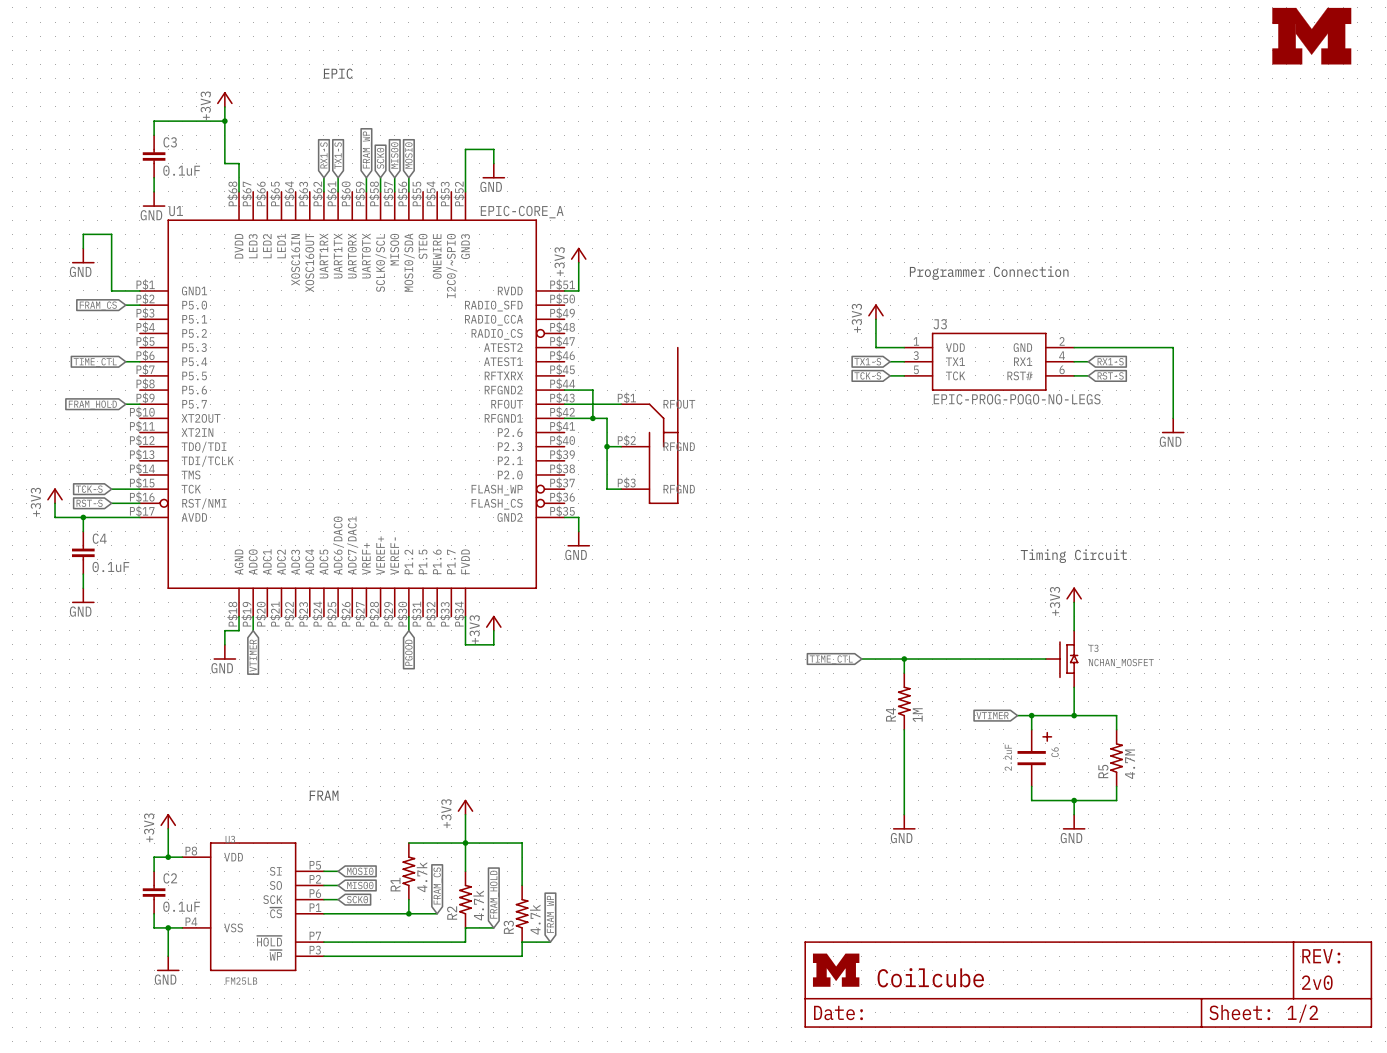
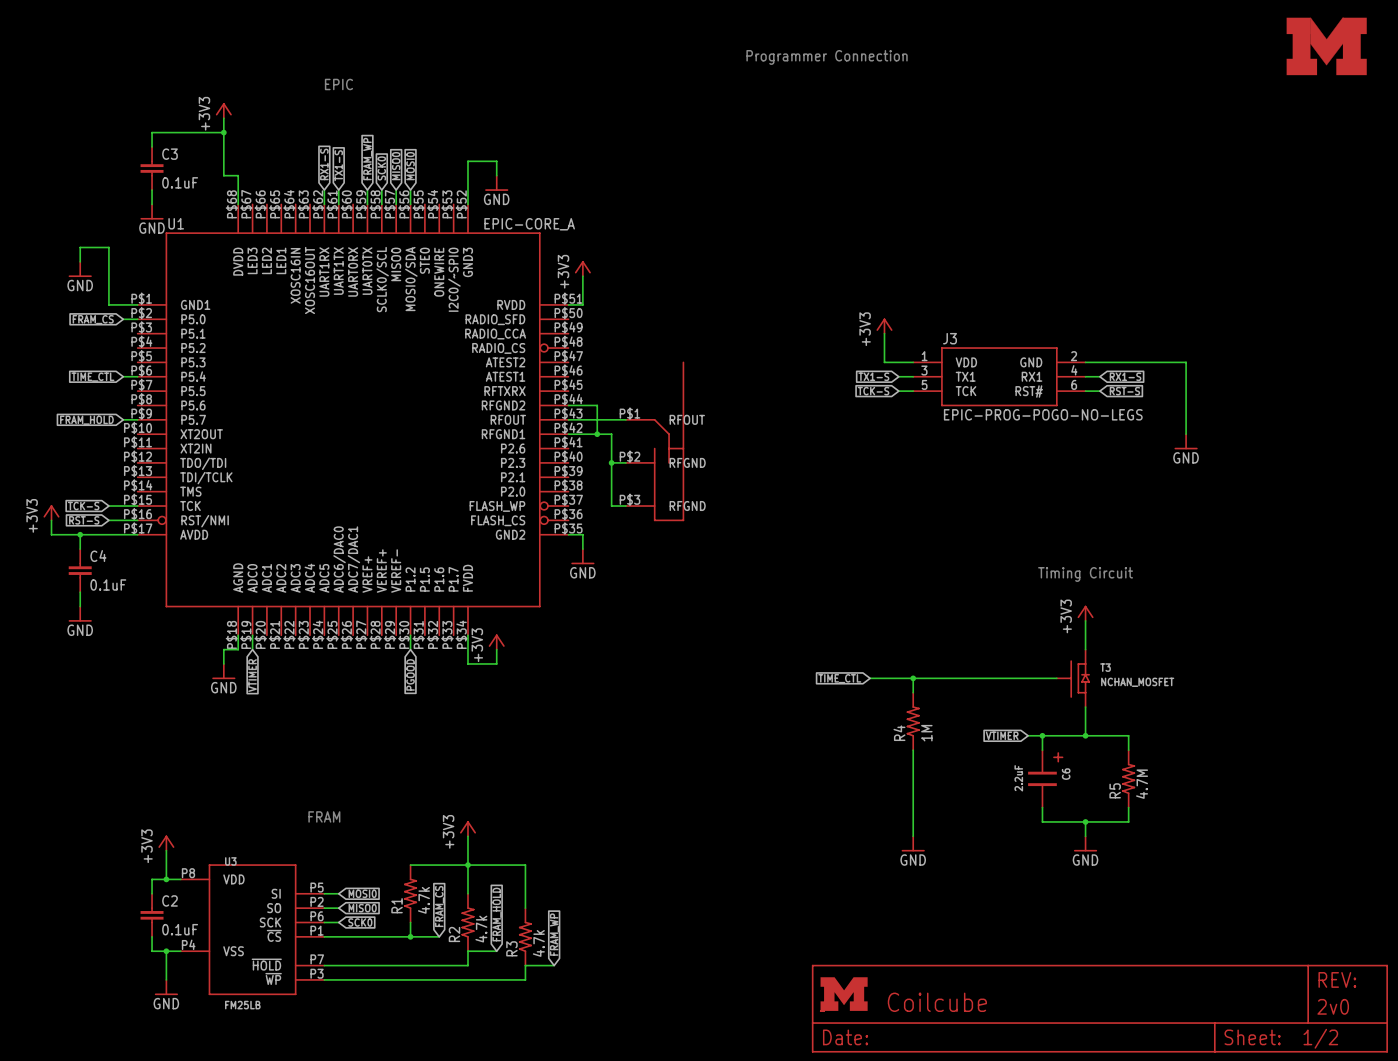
text: none -> Programmer Connection (827, 57)
text: Programmer Connection (989, 273) -> none

